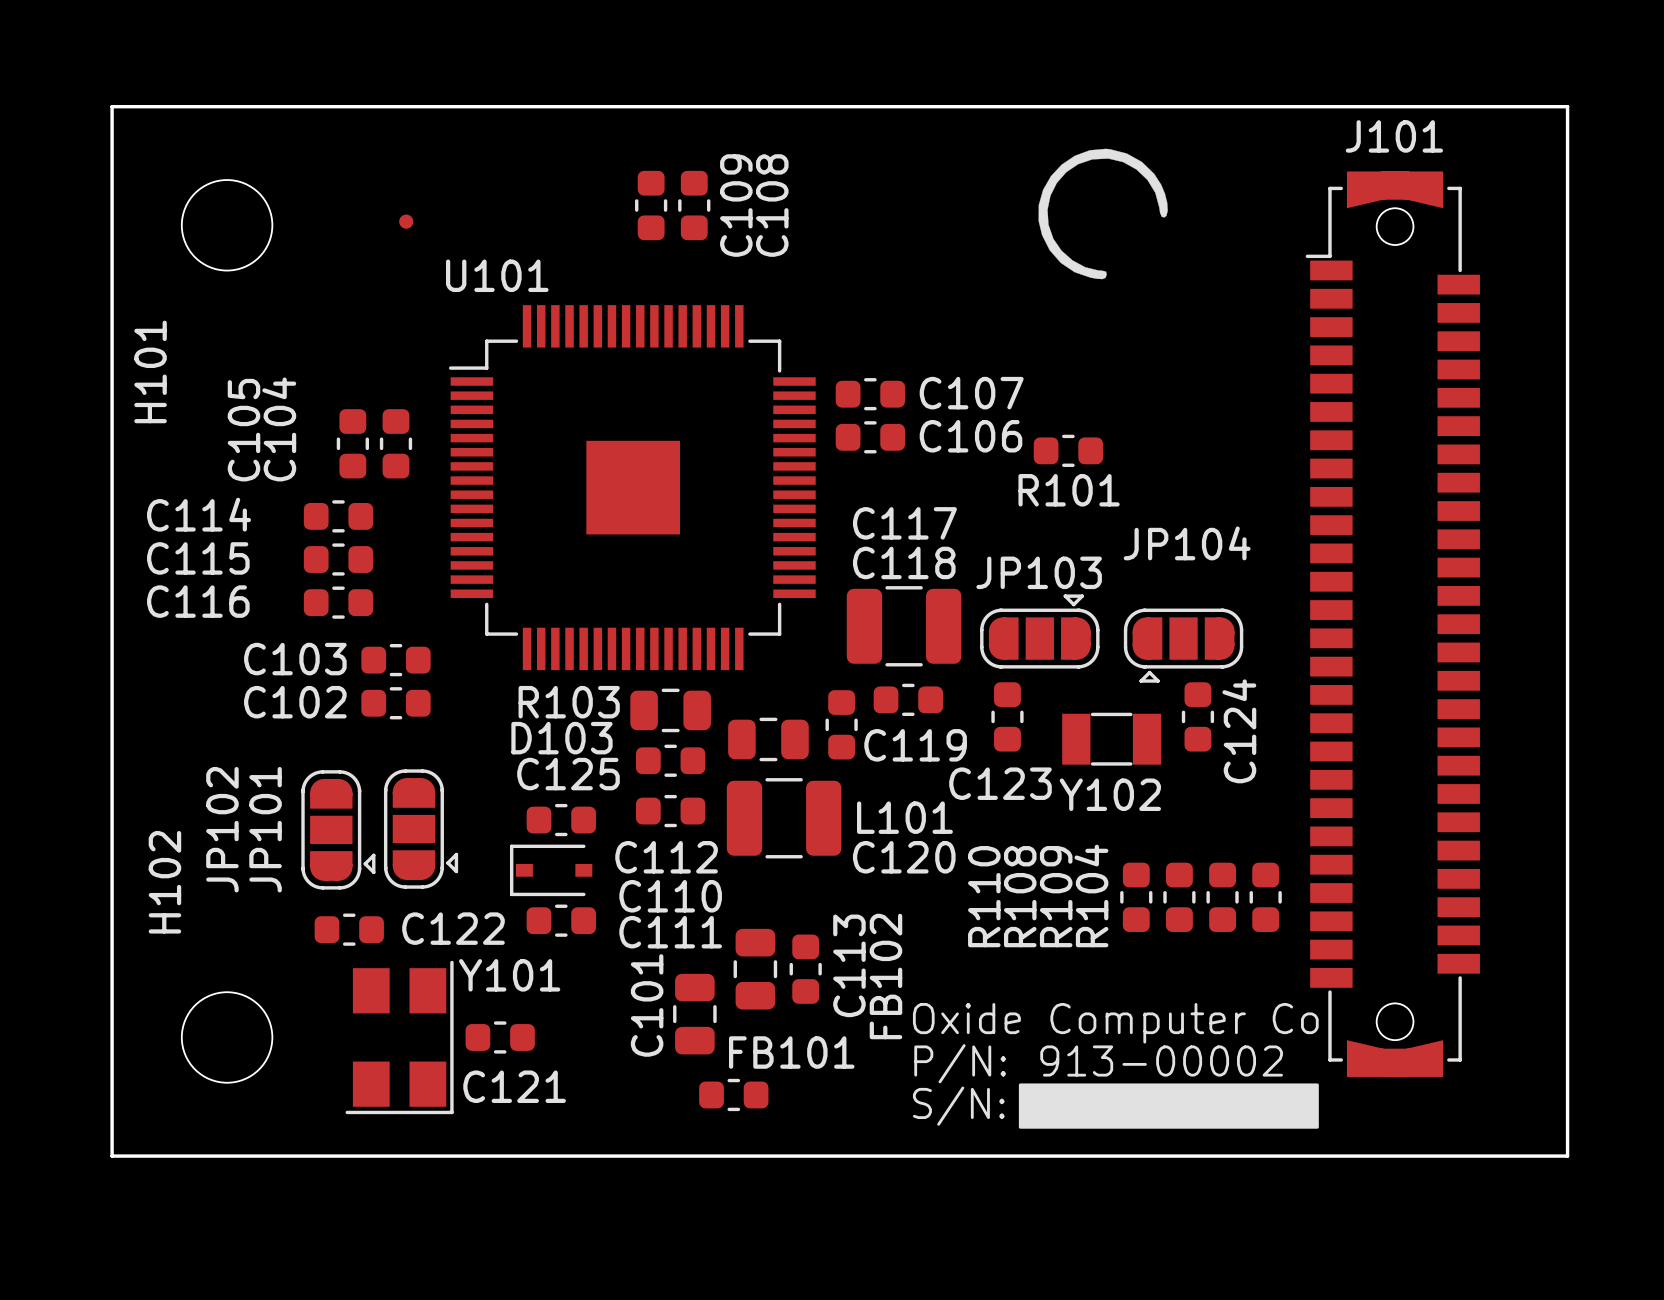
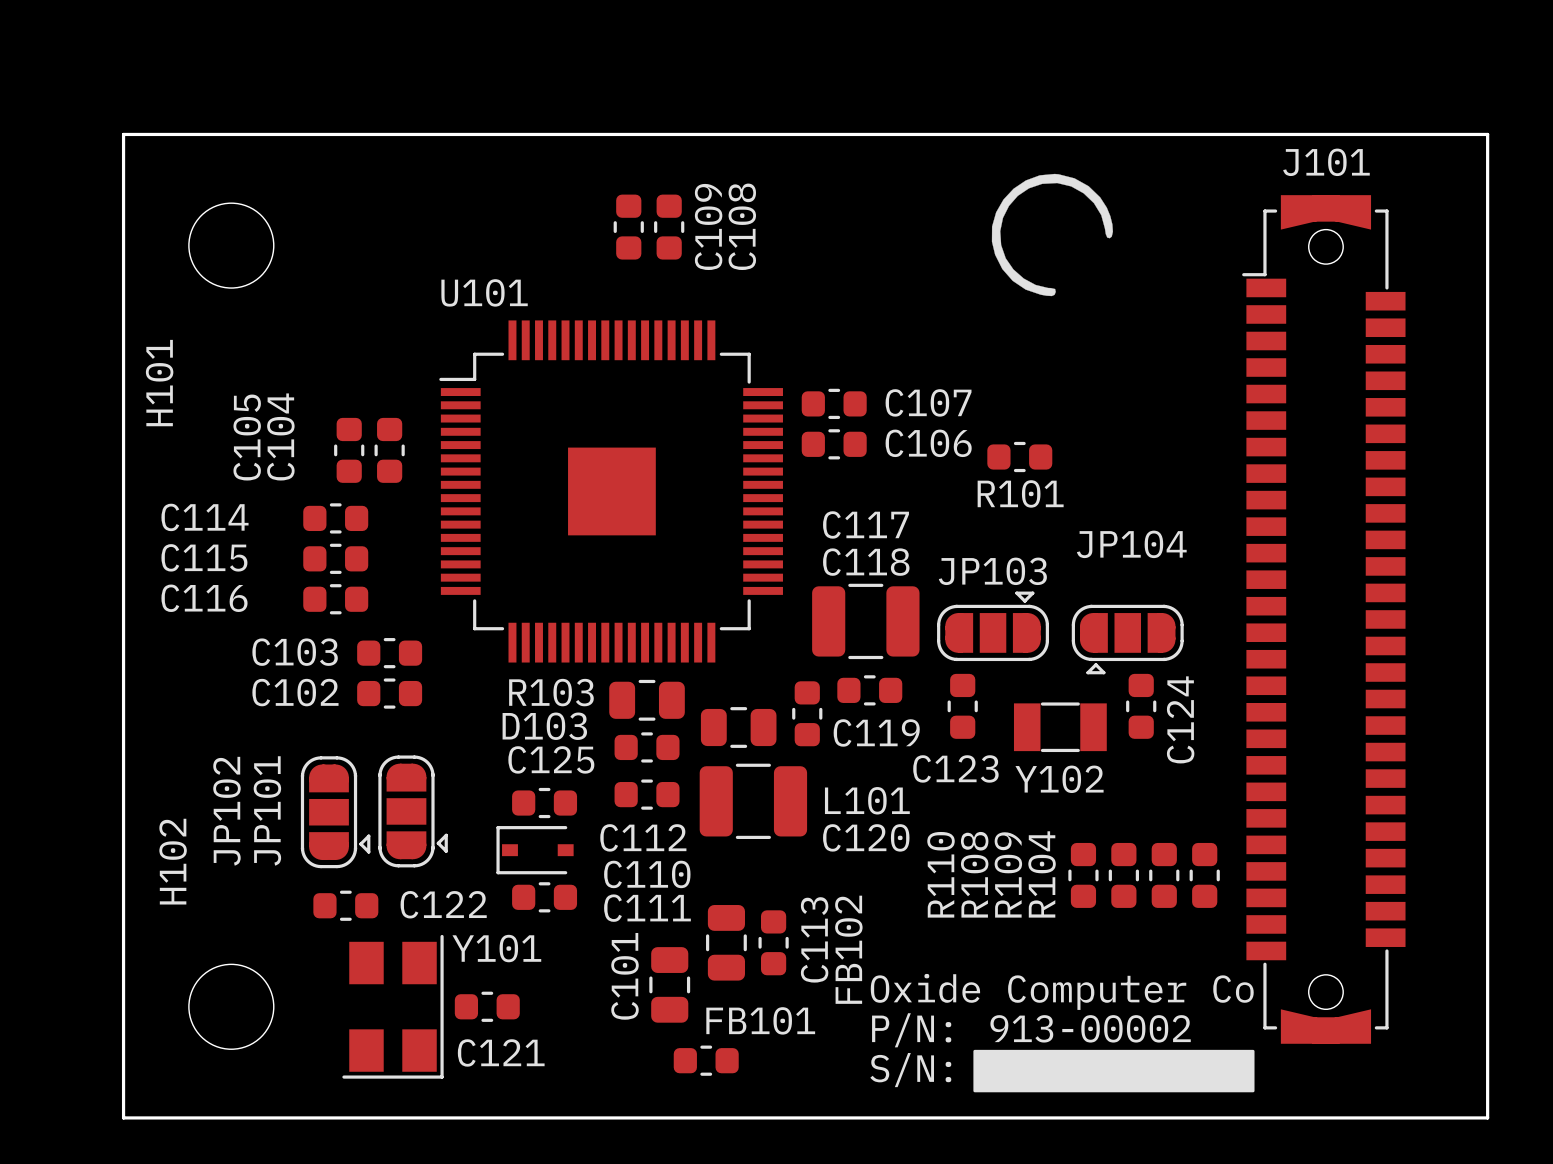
part: (406, 221) -> none

